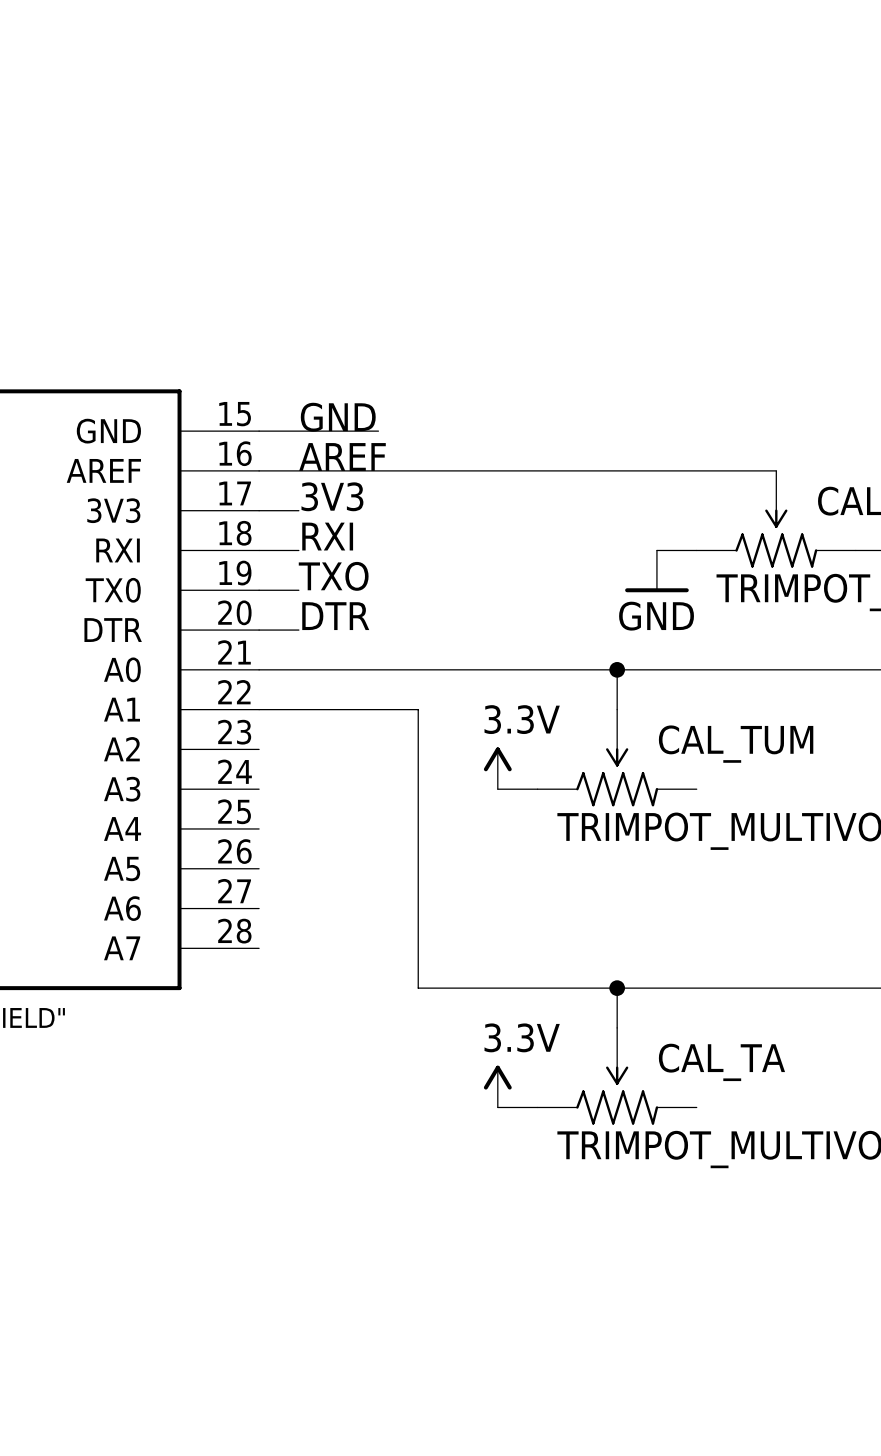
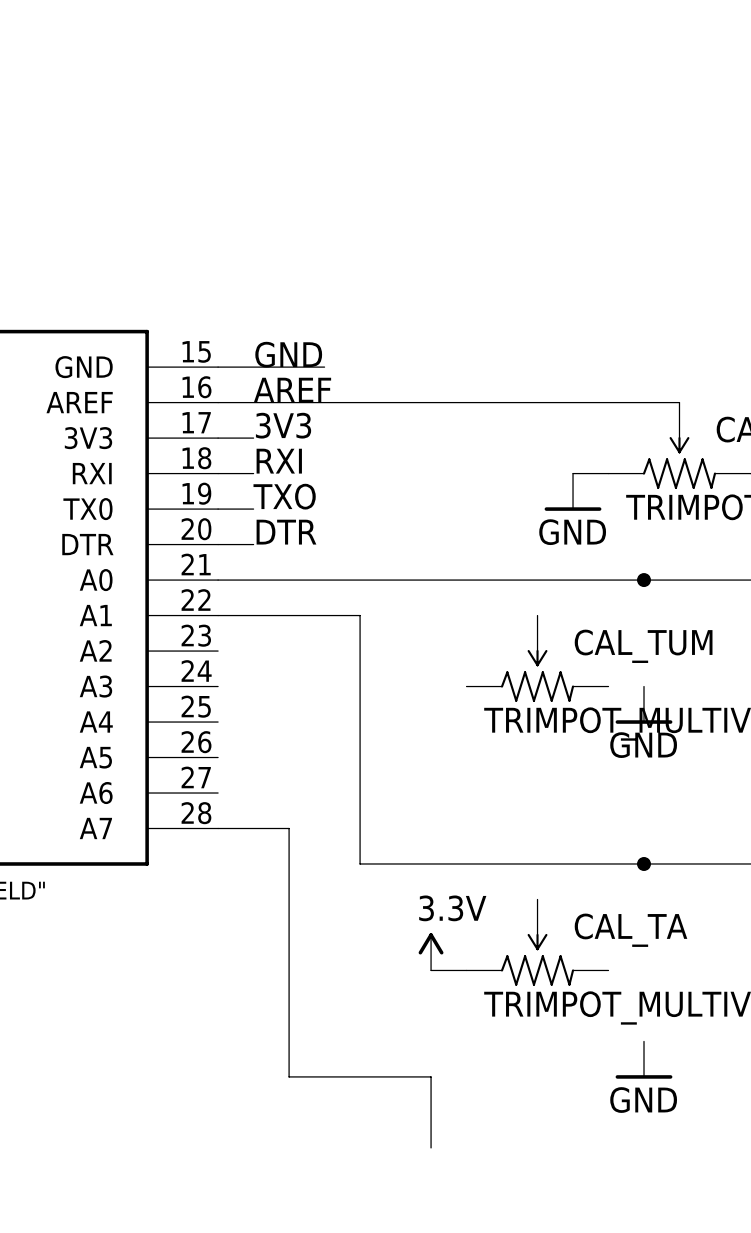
wire: (617, 669) (617, 709) -> none
junction: (617, 669) -> none
junction: none -> (644, 580)
power symbol: 3.3V (497, 768) -> none
wire: (497, 789) (537, 789) -> none
power symbol: none -> GND (644, 705)
wire: none -> (218, 828) (289, 828) (289, 1076) (431, 1076) (431, 1147)
wire: (617, 988) (617, 1027) -> none
junction: (617, 988) -> none
junction: none -> (644, 863)
power symbol: none -> GND (644, 1060)

